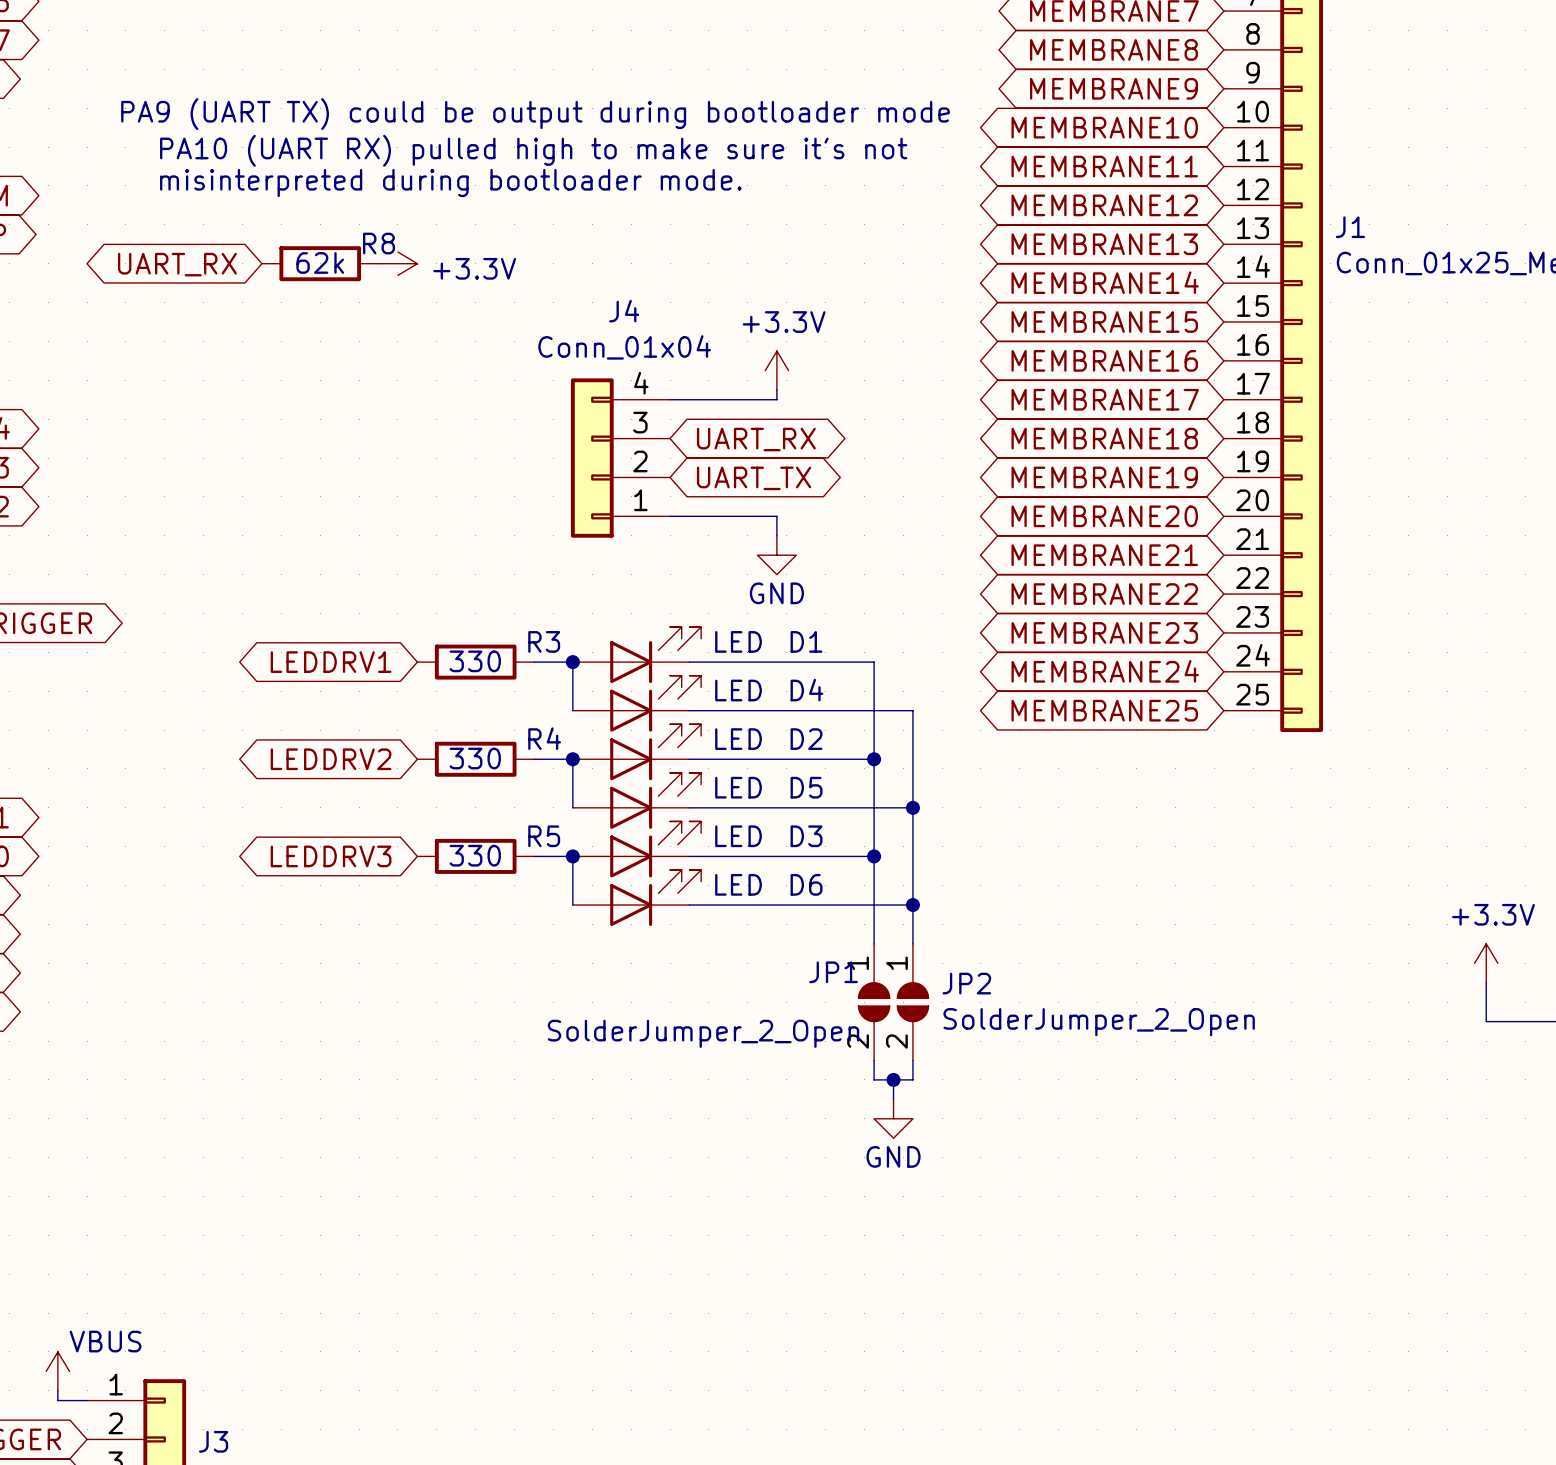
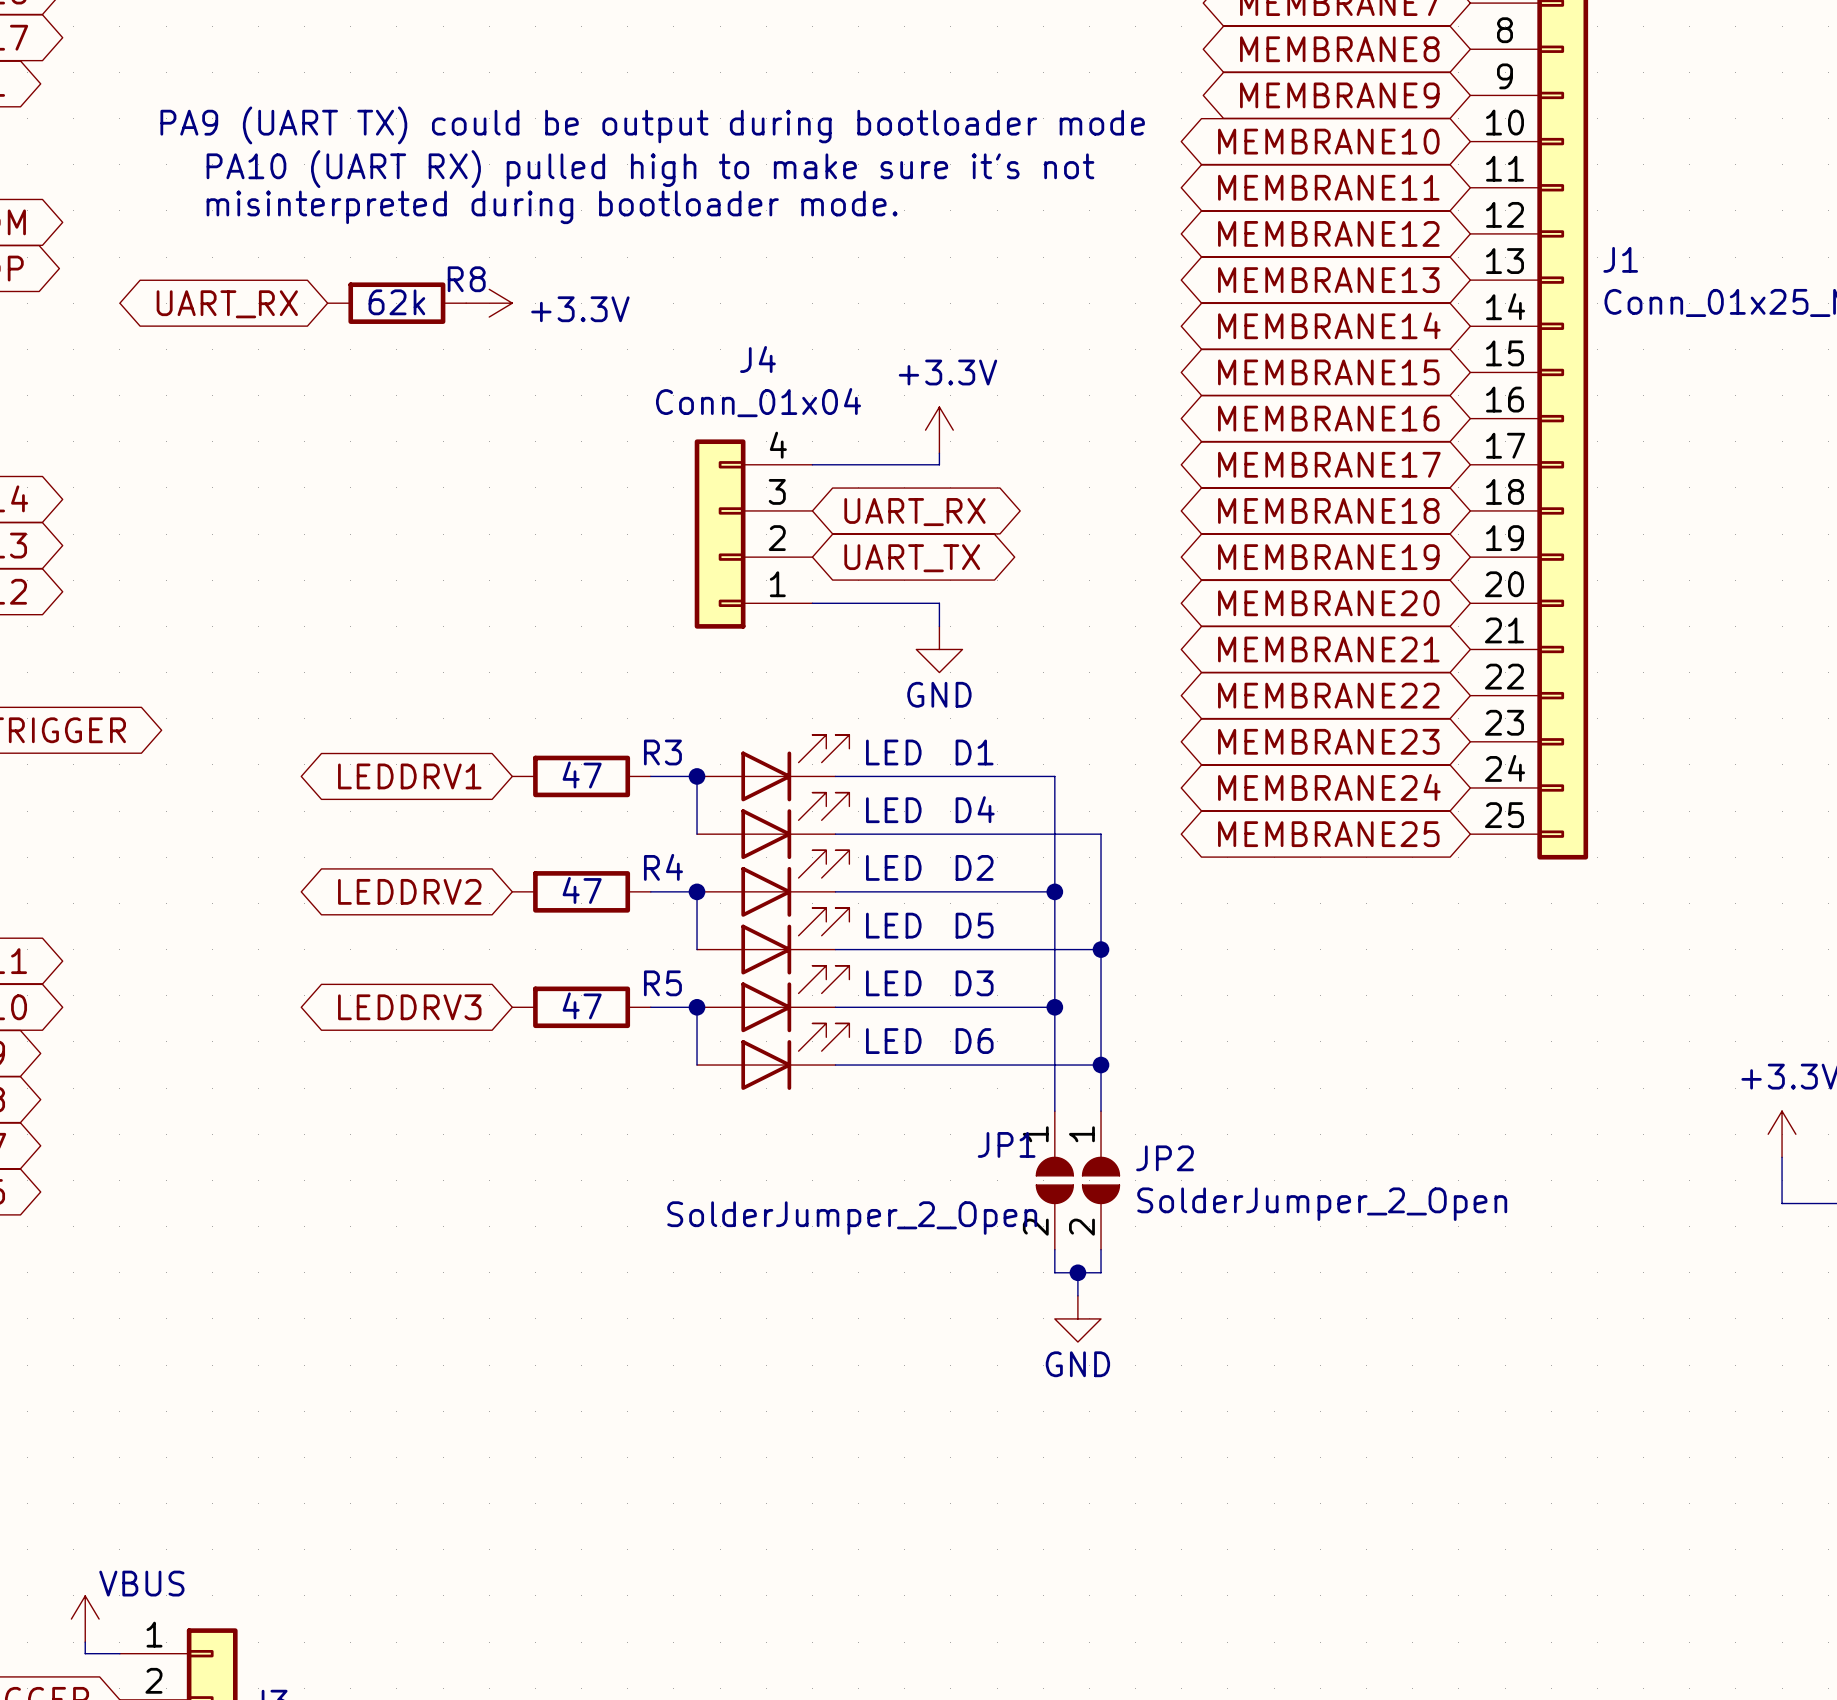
R3 value: 330 (475, 661) -> 47 (582, 775)
R4 value: 330 (475, 758) -> 47 (582, 890)
R5 value: 330 (475, 855) -> 47 (582, 1005)

